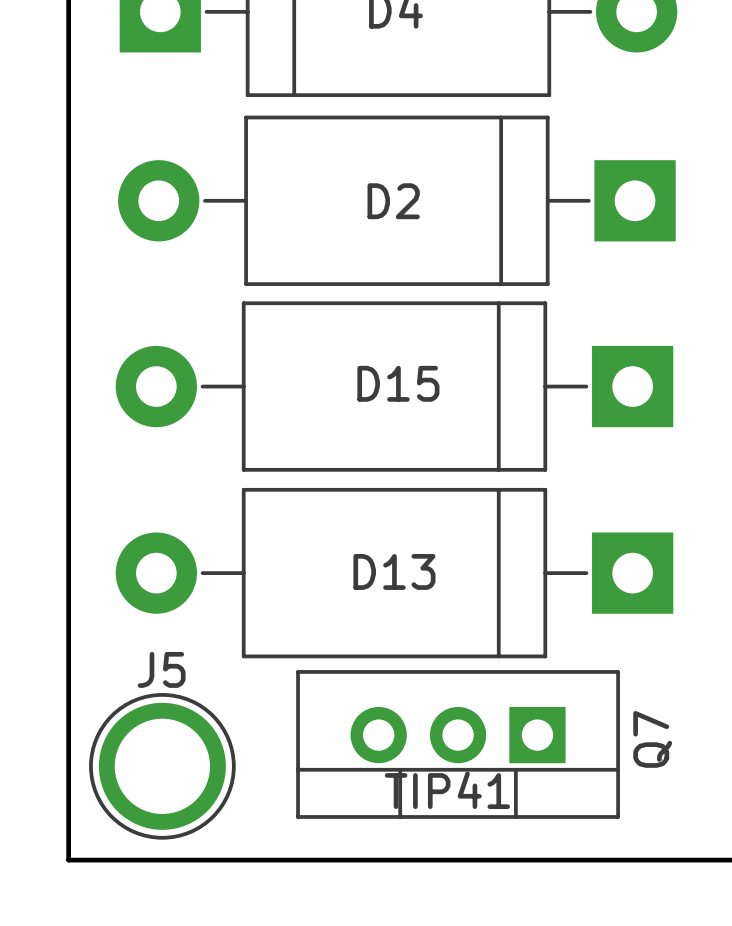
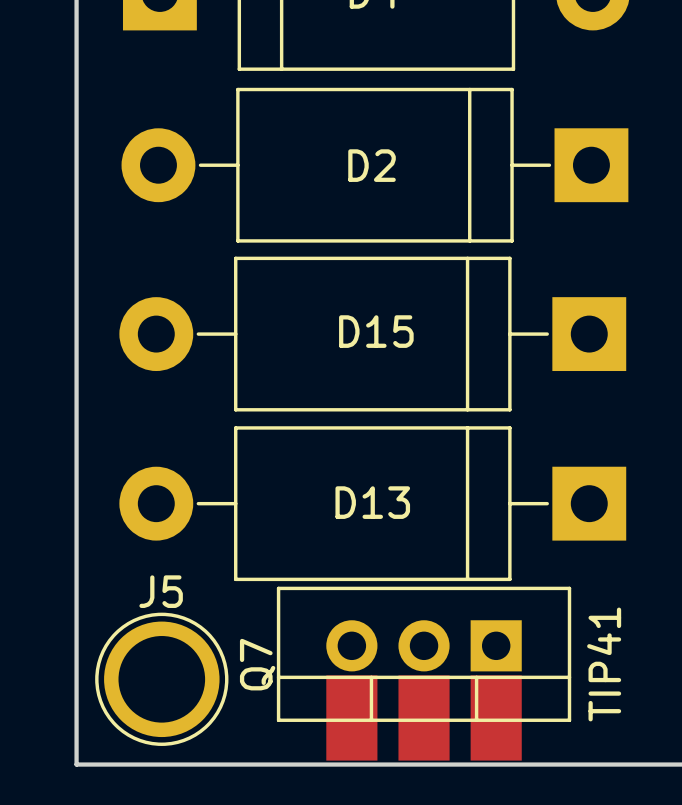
Q7 footprint: [296, 670, 620, 819] -> [276, 586, 572, 761]
Q7 name position: Q7 (652, 739) -> Q7 (257, 664)
text rotation: 0° (447, 790) -> 90° counterclockwise (604, 664)
text position: TIP41 (447, 790) -> TIP41 (604, 664)

